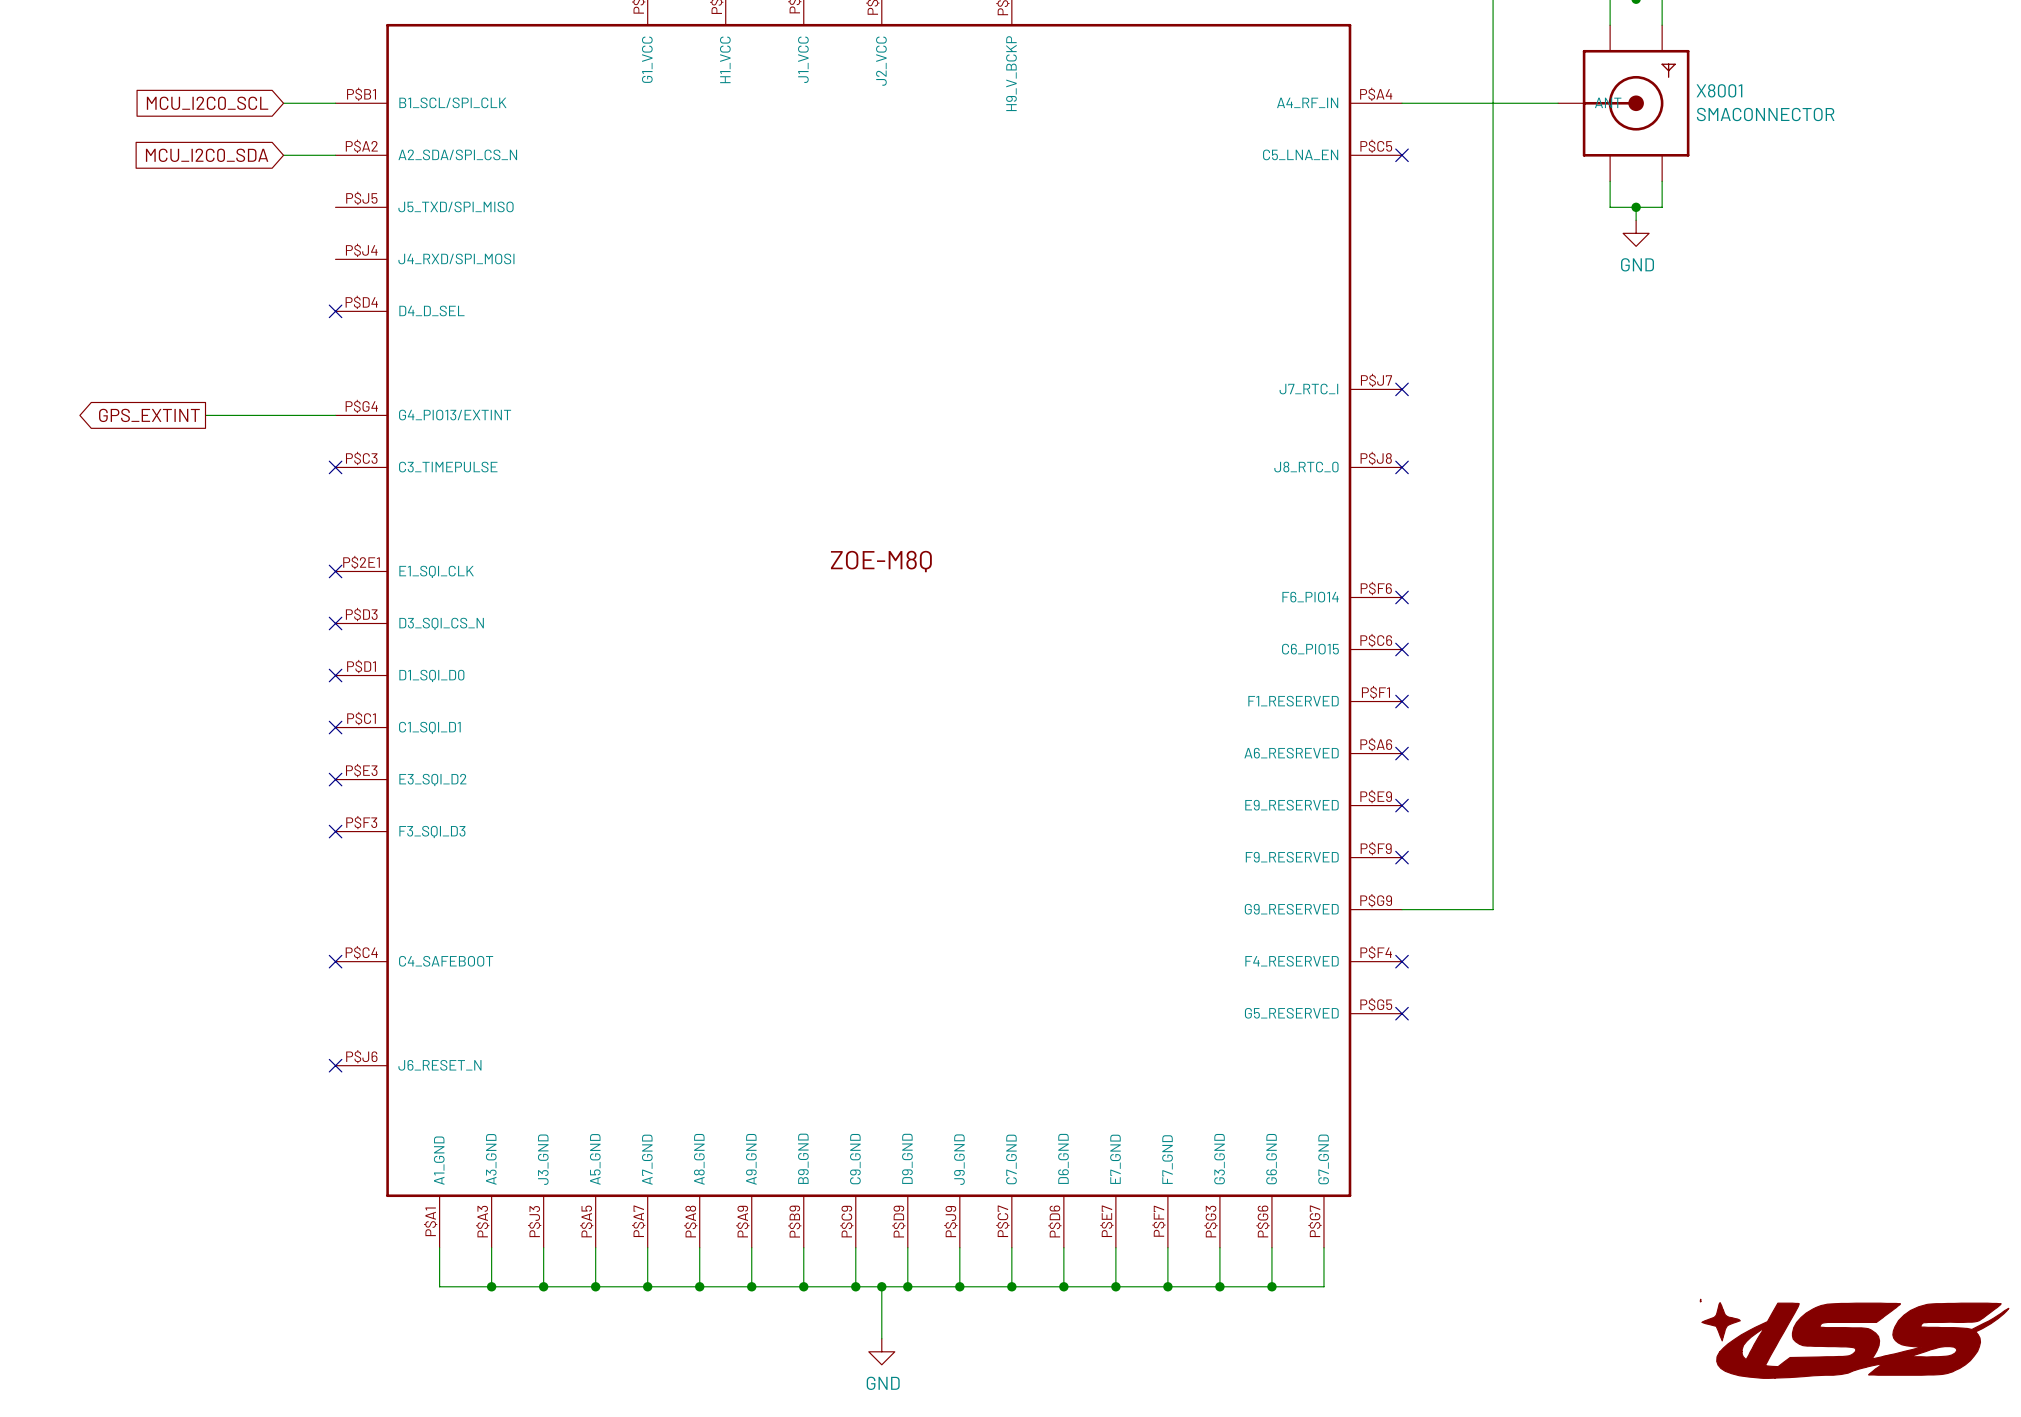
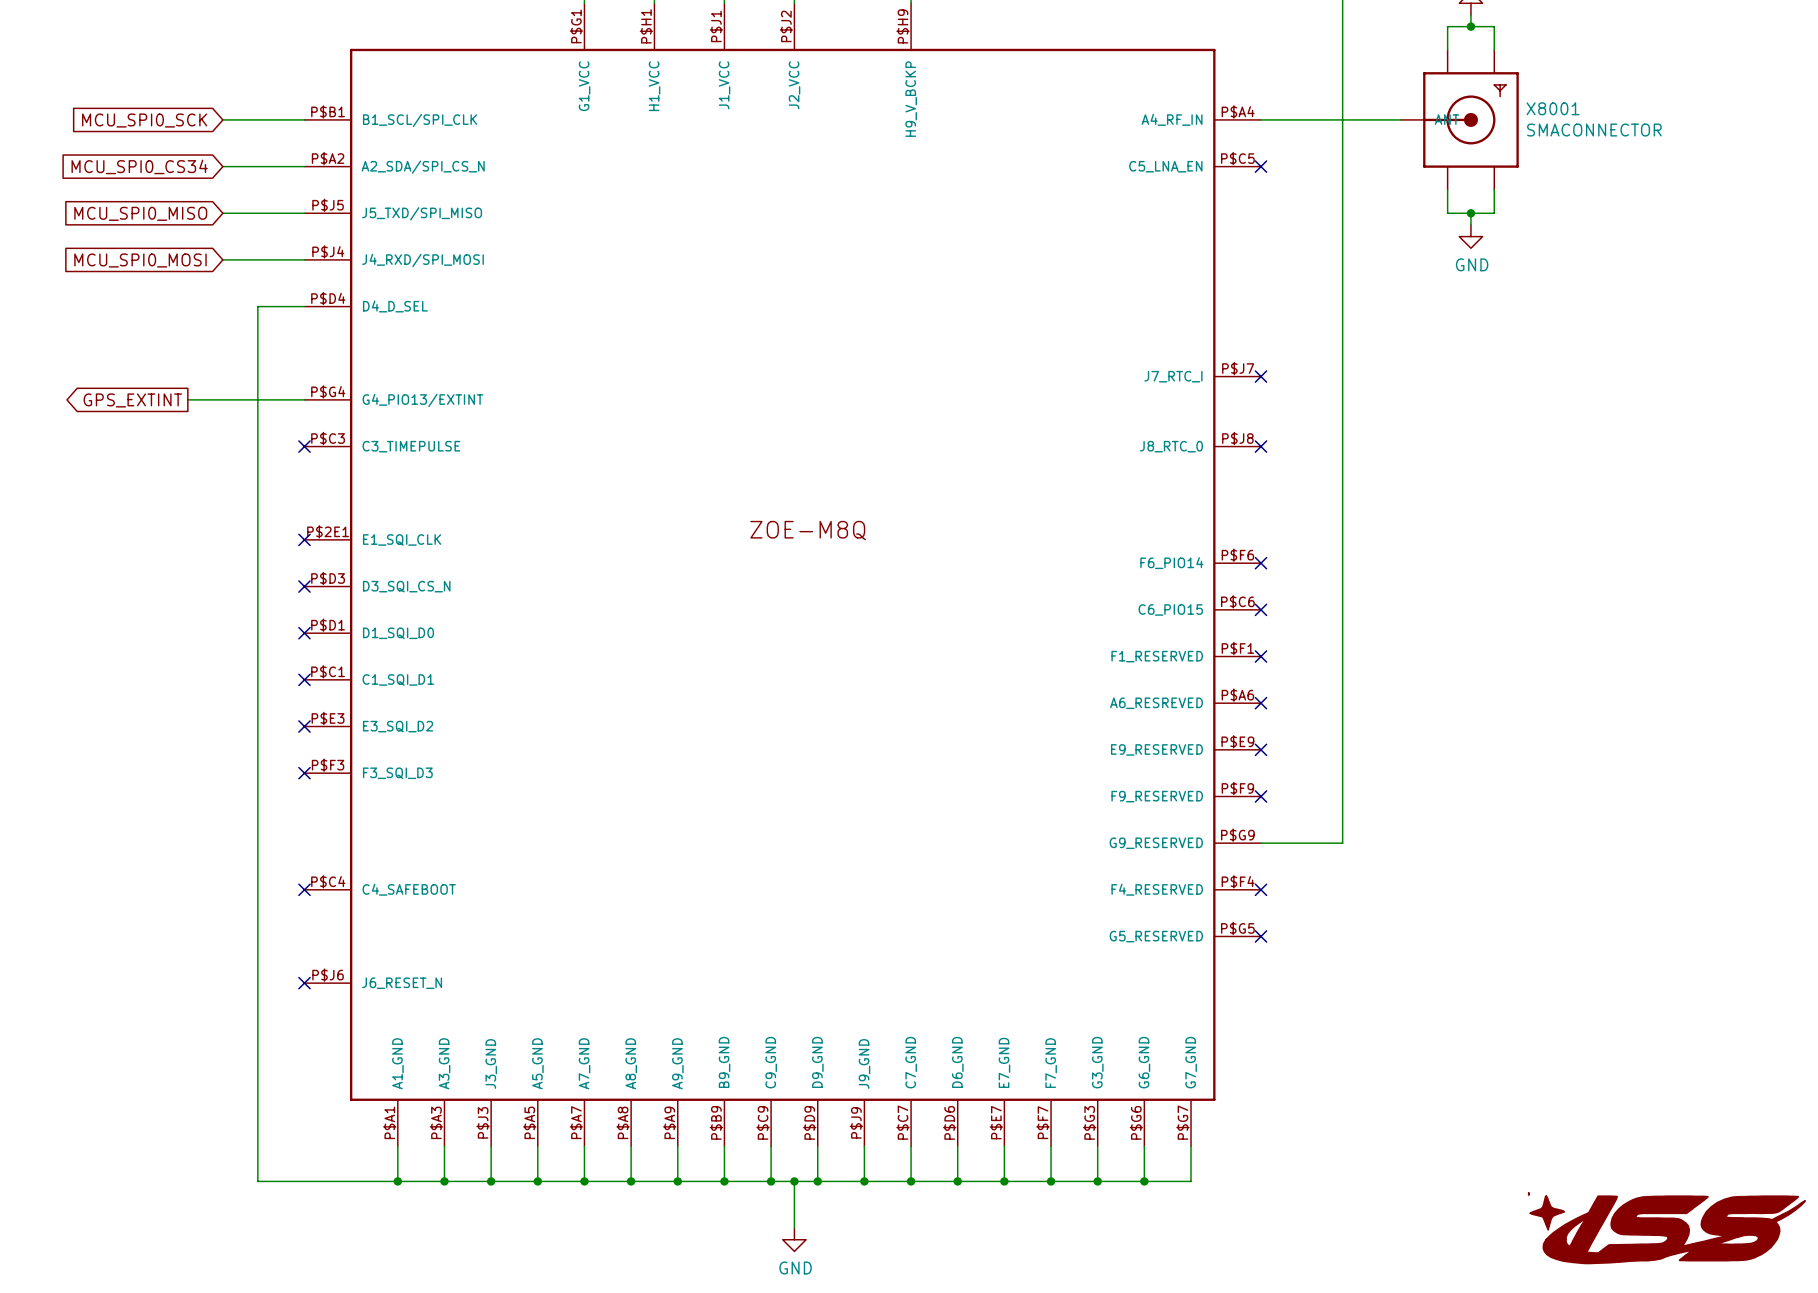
global label: MCU_I2C0_SCL (207, 103) -> MCU_SPI0_SCK (144, 120)
wire: none -> (222, 119) (257, 119)
global label: MCU_I2C0_SDA (207, 155) -> MCU_SPI0_CS34 (139, 166)
wire: none -> (222, 166) (257, 166)
global label: none -> MCU_SPI0_MISO (140, 213)
wire: none -> (222, 213) (304, 213)
global label: none -> MCU_SPI0_MOSI (140, 260)
wire: none -> (222, 259) (304, 259)
wire: none -> (304, 306) (257, 306) (257, 1181) (397, 1181)
no-connect mark: (335, 311) -> none
junction: none -> (397, 1181)

